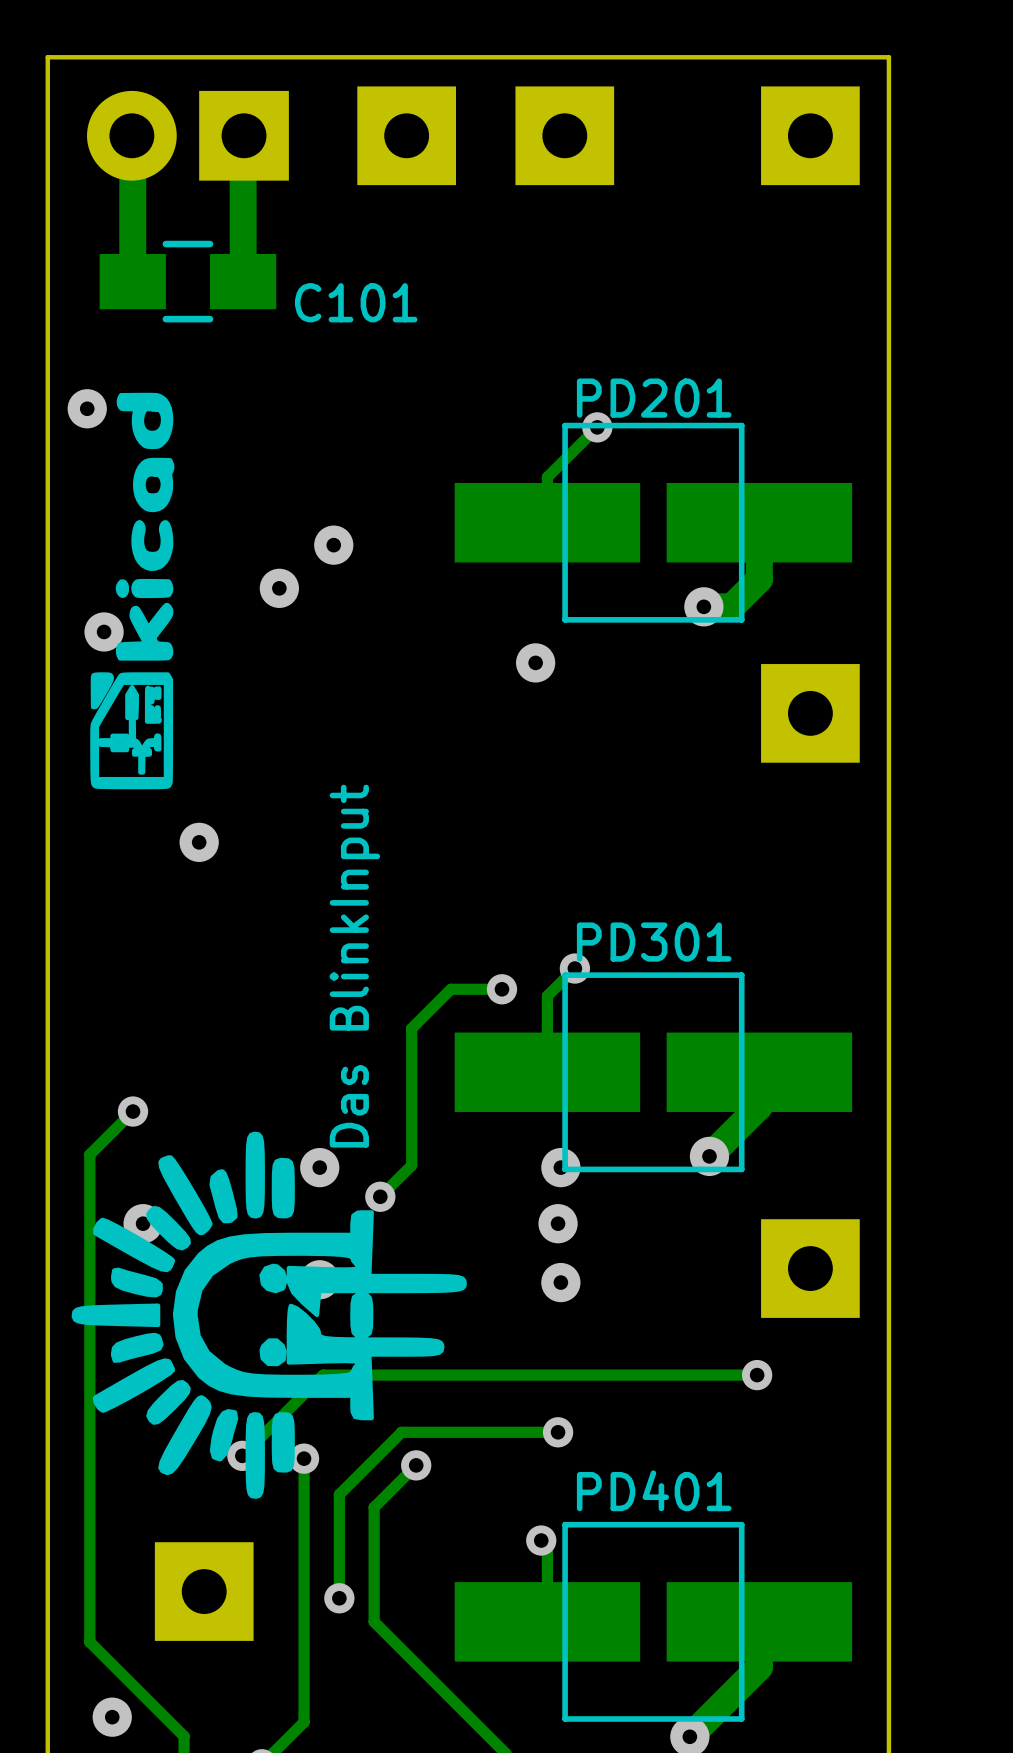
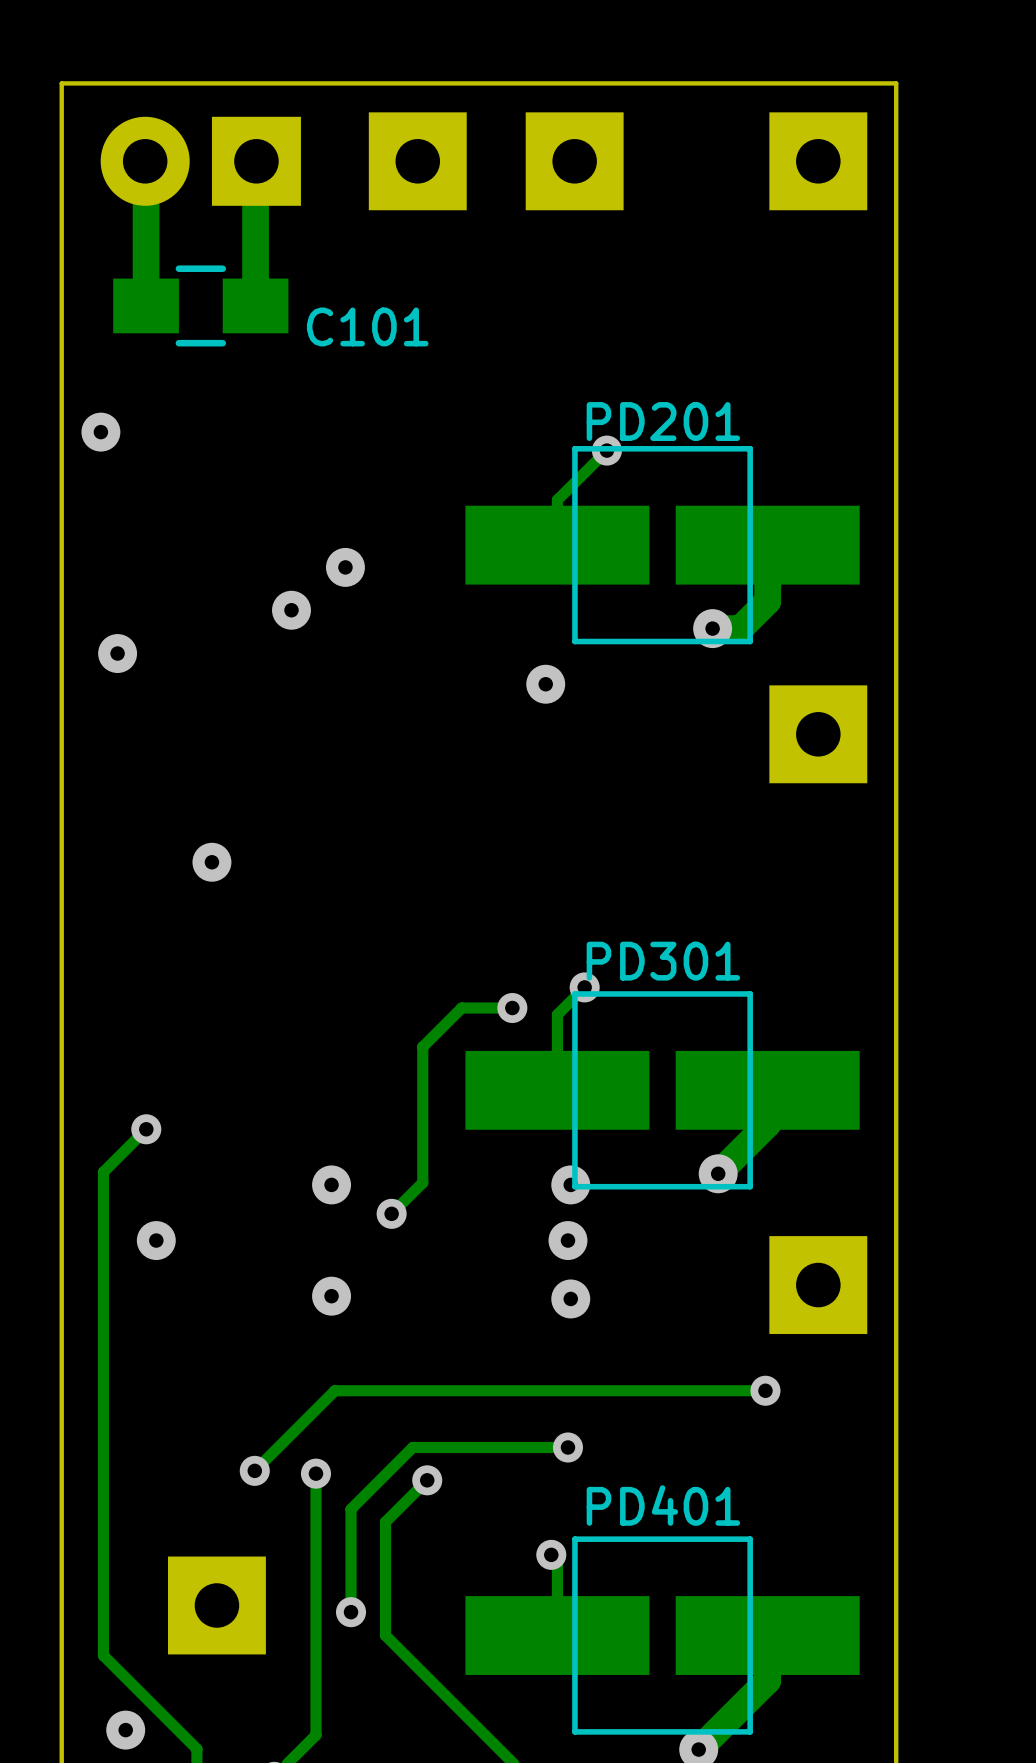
drawing: [90, 392, 175, 790] -> none
text: Das BlinkInput (354, 966) -> none
drawing: [71, 1131, 467, 1499] -> none

